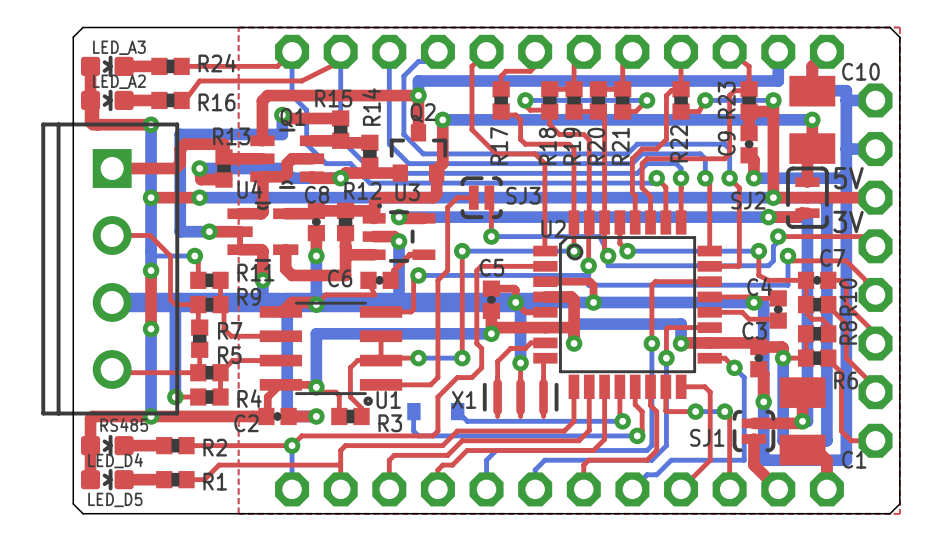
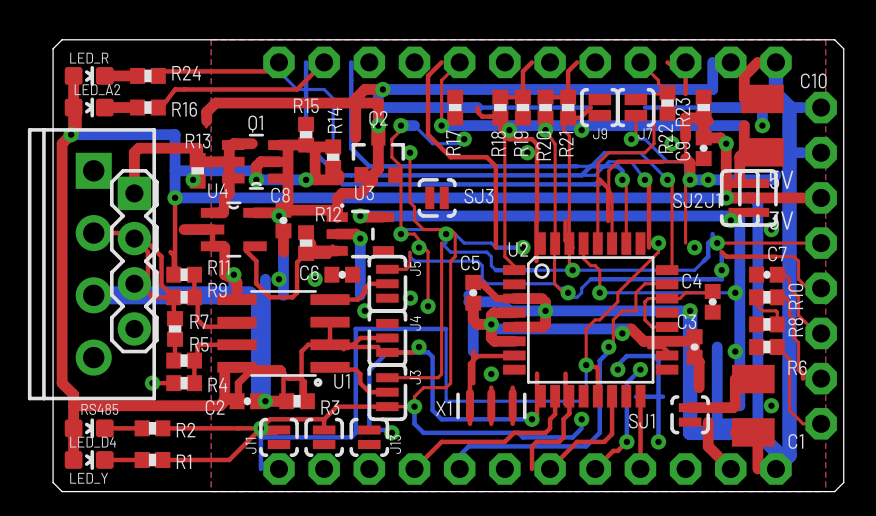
drawing shape: [73, 27, 900, 514] -> [53, 39, 844, 492]
LED_A3 name: LED_A3 (119, 47) -> LED_R (89, 58)
bottom track: (292, 51) (292, 95) (306, 110) (306, 144) (326, 163) (350, 163) (369, 183) (379, 183) -> (278, 62) (283, 66) (283, 75) (297, 89) (324, 89) (333, 98) (333, 175) (342, 184)
top track: (292, 51) (277, 66) (181, 66) -> none
top track: none -> (278, 62) (269, 71) (158, 71)
top track: (340, 51) (340, 61) (301, 80) -> (324, 62) (297, 89) (269, 89)
bottom track: (437, 51) (428, 61) (418, 61) (403, 76) (403, 134) (423, 153) (627, 153) (637, 144) (724, 144) (729, 149) (729, 178) -> none
top track: none -> (459, 62) (441, 80) (441, 125)
top track: (535, 51) (535, 66) (530, 71) (506, 71) (501, 76) (501, 89) -> none
top track: (681, 51) (681, 89) (671, 90) (666, 95) (666, 139) (656, 149) (642, 149) (632, 158) (635, 222) -> none
top track: none -> (640, 62) (667, 92) (653, 94) (653, 143) (644, 152) (608, 152) (597, 163) (597, 243)
bottom track: (826, 51) (812, 66) (812, 91) (846, 90) (846, 460) (763, 460) (763, 304) (761, 302) (282, 302) (262, 304) -> none
bottom track: none -> (775, 62) (775, 94) (789, 107) (789, 455) (775, 469) (775, 450) (757, 432) (690, 432) (690, 310) (509, 310) (500, 301) (468, 301)
top track: none -> (382, 89) (364, 89) (355, 98) (355, 137)
top track: (749, 85) (749, 89) (734, 90) (729, 95) (729, 153) (724, 158) -> (685, 137) (685, 157) (681, 161) (663, 161)
top track: (267, 95) (262, 100) (262, 140) -> (238, 103) (215, 103) (206, 112) (206, 126)
via position: (418, 95) -> (382, 89)
bottom track: none -> (477, 107) (378, 107) (378, 125)
via: (525, 100) -> none
via position: (647, 100) -> (581, 130)
J9: none -> (599, 107)
R22 position: (681, 100) -> (667, 103)
J7: none -> (635, 107)
top track: (705, 100) (699, 111) (681, 111) -> none
via: (705, 100) -> none
R23 position: (749, 100) -> (703, 107)
bottom track: none -> (708, 107) (762, 107) (762, 125)
top track: (773, 100) (773, 197) (792, 197) -> (703, 117) (703, 137) (720, 137) (726, 143) (726, 197)
via: (773, 100) -> none
top track: none -> (563, 115) (563, 130) (569, 135) (569, 266) (572, 270)
top track: none -> (635, 115) (635, 134) (631, 139)
top track: (501, 111) (504, 115) (515, 115) (520, 119) (520, 139) (525, 144) (569, 144) (573, 148) (573, 251) -> none
top track: (574, 111) (598, 111) (604, 117) (604, 252) (608, 256) -> none
bottom track: (282, 115) (282, 134) (180, 134) (180, 231) (209, 231) -> none
top track: (282, 115) (285, 118) (340, 118) -> none
via: (282, 115) -> none
via: none -> (378, 125)
top track: (442, 119) (442, 163) (436, 169) (436, 194) (433, 197) (379, 197) (374, 202) -> (378, 137) (378, 169) (372, 175) (372, 181) (360, 193) (342, 193) (337, 197) (337, 202)
top track: none -> (405, 125) (391, 139) (391, 157) (400, 166) (400, 234) (414, 234) (428, 252) (428, 306)
bottom track: (457, 119) (486, 119) -> (414, 125) (432, 143) (459, 143) (464, 139)
via: none -> (441, 125)
C10 position: (812, 119) -> (762, 125)
via: (812, 119) -> none
via: none -> (762, 125)
top track: (92, 124) (151, 124) -> none
bottom track: (151, 124) (151, 270) -> none
via: (151, 124) -> none
top track: none -> (509, 130) (504, 139) (504, 256) (514, 266) (514, 270)
via: none -> (509, 130)
top track: none -> (545, 130) (555, 144) (554, 283) (563, 292) (568, 292)
via: none -> (545, 130)
bottom track: none -> (71, 134) (175, 134) (175, 197)
via: none -> (71, 134)
via: none -> (464, 139)
bottom track: none -> (631, 139) (644, 139) (667, 161) (685, 161) (685, 179)
via: none -> (631, 139)
via: none -> (672, 143)
via: none -> (726, 143)
top track: (185, 144) (180, 149) (180, 163) (175, 168) (112, 168) -> (161, 148) (138, 148) (134, 152) (134, 193)
C9 position: (749, 144) -> (703, 148)
top track: none -> (288, 149) (288, 202) (278, 215)
top track: none -> (315, 149) (315, 179) (337, 179) (338, 175)
top track: none -> (410, 152) (410, 202) (414, 206) (414, 220) (423, 229) (450, 229) (455, 234) (455, 256) (450, 261) (450, 383) (446, 387) (423, 387) (414, 396) (414, 406) (336, 406) (324, 419) (324, 430)
via: none -> (410, 152)
via: none -> (527, 152)
top track: (676, 158) (647, 158) (642, 163) (642, 187) (650, 196) (650, 222) -> (617, 161) (608, 170) (608, 188) (612, 196) (612, 243)
bottom track: (632, 163) (642, 153) (700, 153) (705, 158) (705, 178) -> (581, 175) (595, 175) (608, 161) (631, 161) (644, 179)
bottom track: none -> (577, 166) (590, 166) (604, 152) (640, 152) (663, 175) (667, 175)
top track: (199, 168) (201, 179) (224, 179) -> none
via position: (199, 168) -> (193, 179)
top track: (287, 173) (283, 176) (262, 176) (262, 212) (251, 213) -> (252, 143) (233, 143) (229, 148) (229, 193) (224, 197) (223, 212)
top track: (400, 173) (345, 173) (340, 178) (312, 176) -> none
top track: none -> (667, 175) (672, 184) (672, 269) (667, 270)
via: none -> (256, 179)
via: (656, 178) -> none
top track: (681, 178) (681, 222) -> (622, 179) (626, 183) (626, 243)
top track: (729, 178) (739, 187) (739, 265) (709, 266) -> none
top track: none -> (685, 179) (685, 243)
via: none -> (708, 179)
top track: (151, 197) (199, 197) -> (178, 270) (175, 266) (175, 197)
via: (151, 197) -> none
top track: (473, 197) (457, 197) (447, 207) (447, 270) (437, 280) (437, 377) (430, 384) (381, 384) -> none
top track: (489, 197) (491, 200) (491, 236) -> none
via: (773, 197) -> none
via: none -> (726, 197)
J1: none -> (757, 197)
top track: (807, 213) (801, 213) (797, 217) (768, 217) -> none
via: none -> (278, 215)
via: (768, 217) -> none
R12 position: (345, 221) -> (306, 243)
via: none -> (730, 220)
via: (209, 231) -> none
via: none -> (771, 229)
top track: (345, 233) (345, 275) (292, 275) (285, 269) (285, 249) -> none
via: none -> (400, 234)
bottom track: (491, 236) (599, 236) (604, 246) (604, 252) (608, 256) (608, 265) (768, 265) -> (536, 270) (694, 270) (703, 261)
top track: (778, 236) (865, 236) (875, 246) -> none
via: (778, 236) -> none
top track: none -> (134, 238) (143, 238) (161, 256) (161, 285) (169, 292)
top track: none -> (441, 243) (441, 374) (438, 377) (387, 377)
top track: none -> (583, 243) (583, 258) (590, 265) (595, 265) (599, 270) (599, 292)
top track: none -> (658, 243) (658, 252) (617, 292) (617, 301) (599, 319) (595, 319) (586, 328) (586, 365) (597, 367) (597, 396)
via: none -> (658, 243)
top track: none -> (717, 243) (821, 243)
via: none -> (717, 243)
top track: (251, 249) (262, 251) (262, 280) -> (223, 246) (224, 274) (236, 282) (236, 299)
top track: none -> (245, 246) (245, 250) (256, 261) (256, 283) (269, 297) (292, 297) (297, 292) (297, 262) (306, 253) (309, 256) (328, 256) (332, 252) (332, 246)
bottom track: (151, 251) (155, 256) (194, 256) -> none
bottom track: (462, 251) (544, 251) -> (400, 234) (405, 229) (450, 229) (464, 243) (491, 243) (495, 247)
top track: (462, 251) (462, 358) -> none
bottom track: (627, 251) (758, 251) -> none
via: (627, 251) -> none
top track: (758, 251) (758, 275) (768, 280) (806, 280) (807, 314) (812, 319) (822, 319) (828, 325) (828, 333) -> none
top track: (423, 254) (410, 254) (394, 270) (394, 276) (390, 280) -> none
via: (194, 256) -> none
via: (316, 256) -> none
top track: none -> (410, 252) (410, 265) (406, 269) (387, 269)
via: (608, 256) -> none
via: (788, 256) -> none
top track: (846, 260) (865, 280) (865, 285) (875, 294) -> (775, 256) (794, 256) (798, 261) (798, 279) (807, 288) (821, 288)
part: none -> (134, 261)
bottom track: (588, 265) (588, 285) (647, 285) -> (410, 252) (410, 256) (414, 261) (477, 261) (482, 265) (482, 279) (486, 283) (554, 283) (559, 288) (563, 288) (572, 297) (577, 297) (581, 292) (581, 288) (590, 279)
via: (588, 265) -> none
top track: (545, 266) (481, 266) (476, 270) (476, 343) (481, 348) (481, 367) (471, 377) (457, 377) (437, 397) (437, 431) (433, 435) (360, 435) -> none
top track: (151, 270) (151, 328) -> none
via: (151, 270) -> none
part position: (583, 270) -> (550, 265)
bottom track: (418, 275) (544, 275) -> (446, 243) (441, 243) (450, 252) (486, 252) (491, 256) (491, 265) (495, 270)
top track: (418, 275) (413, 280) (413, 309) (411, 311) (381, 311) -> none
via: (418, 275) -> none
via: none -> (572, 270)
via: none -> (721, 270)
top track: (368, 280) (374, 294) (326, 294) (316, 304) (314, 302) (292, 302) (280, 311) -> none
C7 position: (817, 280) -> (766, 274)
top track: (828, 280) (841, 280) (846, 285) (846, 304) (875, 333) (875, 343) -> none
top track: none -> (777, 274) (785, 274) (789, 279) (789, 288) (798, 297) (798, 315) (816, 333) (821, 333)
top track: (545, 281) (589, 281) (593, 285) (593, 302) -> none
top track: (709, 281) (655, 281) (651, 285) (651, 343) -> none
bottom track: none -> (265, 279) (265, 401)
via: none -> (278, 279)
via: none -> (315, 279)
top track: (491, 288) (514, 288) (515, 302) (525, 312) (545, 312) -> none
top track: none -> (473, 282) (482, 283) (497, 298) (542, 298)
top track: none -> (387, 283) (369, 283) (364, 288) (364, 292) (358, 299) (330, 299)
J5: none -> (387, 283)
top track: none -> (667, 284) (644, 283) (635, 292) (635, 310) (622, 310) (613, 319) (613, 347)
top track: (545, 296) (571, 296) (574, 299) (574, 343) -> none
top track: (709, 296) (748, 296) (753, 302) (758, 298) (778, 298) -> (667, 327) (652, 327) (644, 319) (644, 301) (648, 298) (679, 298) (685, 292) (712, 291)
C5 position: (491, 299) -> (473, 292)
via: none -> (568, 292)
bottom track: none -> (599, 292) (735, 292)
via: none -> (599, 292)
via: none -> (735, 292)
top track: none -> (752, 292) (757, 298) (757, 306) (762, 310) (777, 312) (777, 324)
bottom track: (180, 302) (175, 307) (175, 397) -> none
via: (515, 302) -> none
via: (593, 302) -> none
via position: (753, 302) -> (690, 310)
via: (316, 304) -> none
U2 position: (627, 304) -> (590, 319)
R10 position: (817, 304) -> (766, 297)
top track: (828, 304) (846, 324) (846, 358) (870, 382) -> (777, 297) (785, 297) (789, 301) (789, 315) (794, 319) (794, 337) (798, 342) (798, 369)
via: none -> (410, 298)
top track: none -> (545, 301) (545, 324) (542, 327) (514, 327)
top track: (491, 310) (491, 333) (497, 327) (574, 328) -> none
top track: none -> (473, 303) (473, 319) (477, 324) (491, 324) (488, 321)
top track: (709, 312) (742, 312) (749, 319) (778, 320) -> none
via: none -> (428, 306)
via: none -> (364, 310)
via: none -> (545, 310)
top track: none -> (514, 312) (493, 312) (491, 315) (491, 337) (494, 341) (514, 341)
top track: (709, 327) (667, 327) (666, 358) -> none
bottom track: (151, 328) (151, 416) -> none
via: (151, 328) -> none
top track: none -> (330, 322) (330, 344)
bottom track: (491, 333) (316, 333) (316, 387) -> none
via: (491, 333) -> none
bottom track: none -> (491, 324) (495, 328) (631, 328)
via: none -> (491, 324)
top track: (806, 333) (806, 358) (783, 358) (781, 347) (758, 347) (754, 342) (681, 343) -> none
R8 position: (817, 333) -> (766, 324)
top track: (381, 336) (381, 360) (357, 360) (350, 367) (350, 397) (361, 408) (361, 416) -> none
top track: none -> (631, 328) (643, 341) (693, 341) (694, 355)
top track: (545, 342) (530, 342) (525, 348) (510, 348) (497, 361) (497, 377) -> none
bottom track: (574, 343) (574, 324) (681, 324) (681, 343) -> none
via: (574, 343) -> none
bottom track: (651, 343) (651, 445) (647, 450) (569, 450) -> (581, 428) (572, 437) (522, 437) (518, 432)
via: (651, 343) -> none
top track: none -> (387, 337) (360, 337) (353, 344) (308, 344) (301, 351) (301, 395) (307, 401)
J4: none -> (387, 337)
U1 position: (330, 353) -> (283, 338)
bottom track: (418, 358) (462, 358) -> none
via: (418, 358) -> none
top track: (545, 358) (543, 360) (543, 377) -> none
bottom track: (666, 358) (666, 445) (651, 460) (544, 460) (535, 469) (535, 489) -> none
bottom track: none -> (613, 347) (599, 360) (599, 432) (586, 446) (468, 446) (459, 455) (459, 469)
via position: (783, 358) -> (735, 351)
R6 position: (817, 358) -> (766, 347)
top track: (828, 358) (841, 372) (841, 431) (851, 440) (875, 440) -> none
top track: none -> (777, 347) (789, 359) (789, 410) (803, 423) (821, 423)
top track: (280, 360) (232, 360) (224, 369) -> (236, 344) (199, 344) (197, 347) (197, 357)
via: (520, 362) -> none
top track: none -> (387, 352) (414, 352)
top track: none -> (514, 355) (477, 356) (469, 363) (469, 387)
bottom track: (734, 367) (744, 377) (744, 460) (671, 460) (656, 474) (647, 474) (632, 489) -> none
via: (734, 367) -> none
top track: (112, 369) (115, 372) (198, 372) -> none
bottom track: none -> (586, 365) (586, 396) (581, 401) (446, 401) (446, 328) (355, 328) (355, 432) (351, 437) (260, 437) (256, 432)
via: none -> (586, 365)
top track: none -> (330, 367) (332, 369) (355, 369) (360, 374) (360, 383) (369, 392) (387, 392)
bottom track: none -> (617, 369) (617, 365) (626, 356) (653, 356) (658, 360) (658, 441)
via: none -> (617, 369)
bottom track: none -> (640, 369) (626, 383) (626, 441)
via: none -> (640, 369)
top track: (573, 386) (573, 421) (564, 431) (457, 431) (442, 445) (345, 445) (340, 450) (340, 489) -> none
top track: (604, 386) (604, 439) (593, 450) -> (555, 396) (555, 414) (550, 419) (550, 428) (545, 432) (541, 432)
top track: (635, 386) (635, 404) (642, 411) (642, 431) (637, 435) -> none
top track: (650, 386) (650, 405) (656, 411) (656, 450) (647, 460) -> (612, 396) (612, 434) (604, 441) (590, 441)
top track: (665, 386) (666, 411) (695, 411) -> none
top track: (681, 386) (704, 386) (710, 392) (710, 460) (681, 489) -> none
via: (316, 387) -> none
via: none -> (491, 374)
X1 position: (520, 397) -> (491, 405)
via: (763, 401) -> none
J3: none -> (387, 392)
bottom track: (413, 411) (413, 431) (418, 435) (486, 435) -> (391, 432) (389, 430) (369, 430) (369, 370) (387, 352) (428, 352) (432, 356) (432, 410) (441, 419)
part: (413, 411) -> none
bottom track: (457, 411) (467, 421) (622, 421) -> none
part: (457, 411) -> none
top track: none -> (569, 396) (569, 413) (563, 419) (563, 437) (559, 441)
via: (695, 411) -> none
top track: none -> (640, 396) (640, 468)
top track: (724, 411) (729, 416) (729, 489) -> none
via: (724, 411) -> none
via: (151, 416) -> none
top track: (266, 416) (92, 416) (90, 418) -> (73, 128) (73, 132) (62, 143) (62, 383) (73, 394) (73, 403)
via: none -> (265, 401)
via: (316, 416) -> none
top track: none -> (286, 401) (283, 397) (283, 369) (281, 367) (227, 367) (224, 369) (224, 399) (220, 405) (73, 405)
R3 position: (350, 416) -> (297, 401)
via: (622, 421) -> none
C1 position: (802, 421) -> (753, 405)
via: (802, 421) -> none
via: none -> (771, 405)
via: none -> (414, 406)
bottom track: (583, 435) (637, 435) -> none
top track: (583, 435) (578, 440) (462, 440) (447, 455) (394, 455) (389, 460) (389, 489) -> none
via: none -> (531, 419)
top track: (753, 438) (753, 465) (778, 489) -> (708, 422) (708, 446) (730, 469)
top track width: thick (124, 445) (164, 445) -> thin (104, 428) (142, 428)
via: none -> (391, 432)
bottom track: (496, 450) (486, 460) (486, 489) -> (450, 432) (423, 432) (414, 423) (414, 406)
top track: (564, 450) (467, 450) (452, 465) (442, 465) (437, 469) (437, 489) -> (513, 432) (504, 441) (441, 441) (414, 469)
J11: none -> (278, 437)
part: none -> (324, 437)
J13: none -> (369, 437)
top track: (612, 460) (632, 460) -> (550, 469) (577, 441)
top track: none -> (626, 441) (617, 450) (613, 450) (595, 469)
via: none -> (626, 441)
via: none -> (658, 441)
top track: (340, 465) (219, 465) (204, 479) -> (278, 430) (276, 432) (256, 432) (229, 459) (179, 459)
top track width: thick (124, 479) (164, 479) -> thin (104, 459) (142, 459)
LED_D5 name: LED_D5 (115, 499) -> LED_Y (89, 478)

